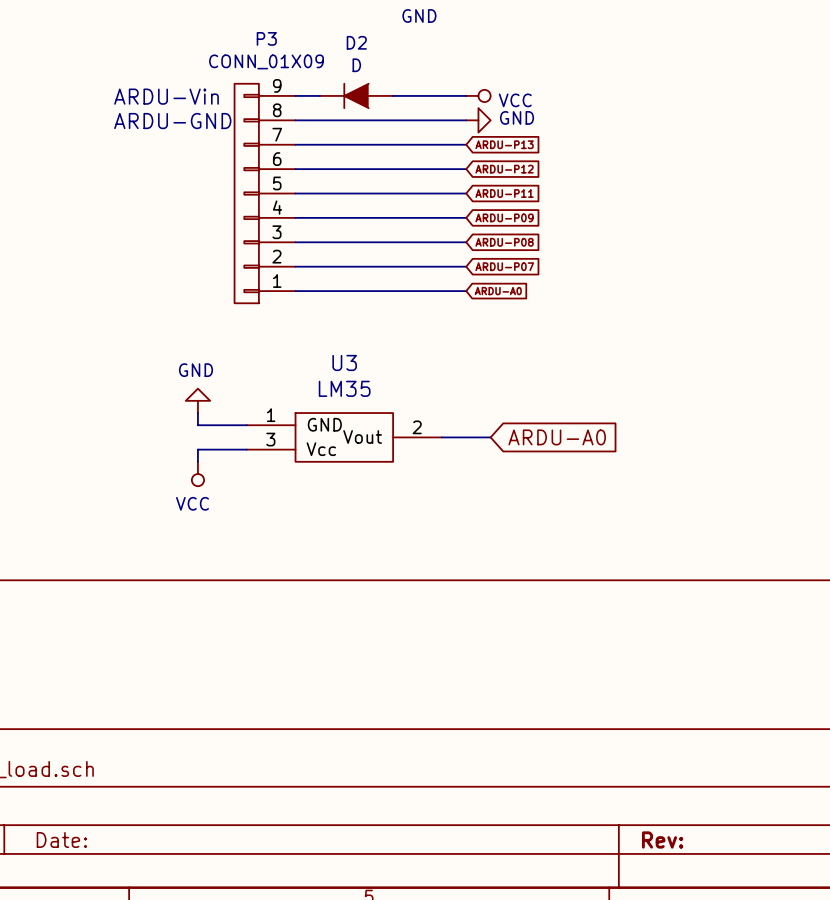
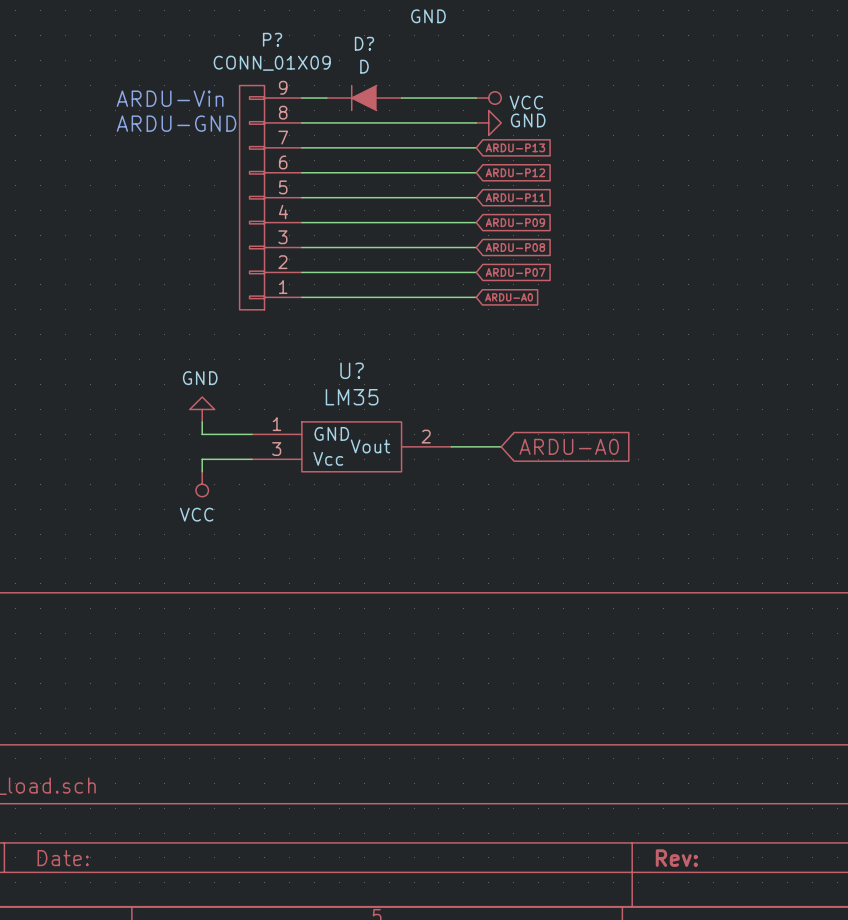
P3 name: P3 (266, 38) -> P? (272, 39)
D2 name: D2 (356, 42) -> D? (364, 43)
U3 name: U3 (344, 362) -> U? (352, 370)

